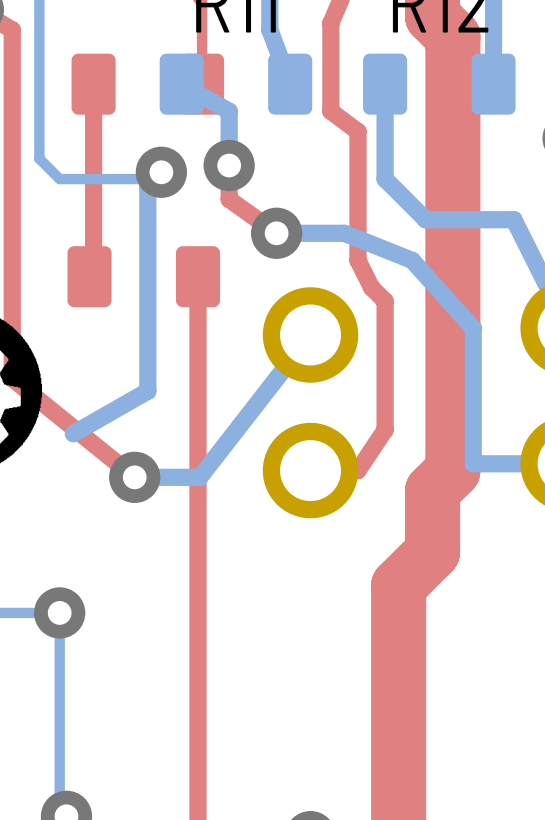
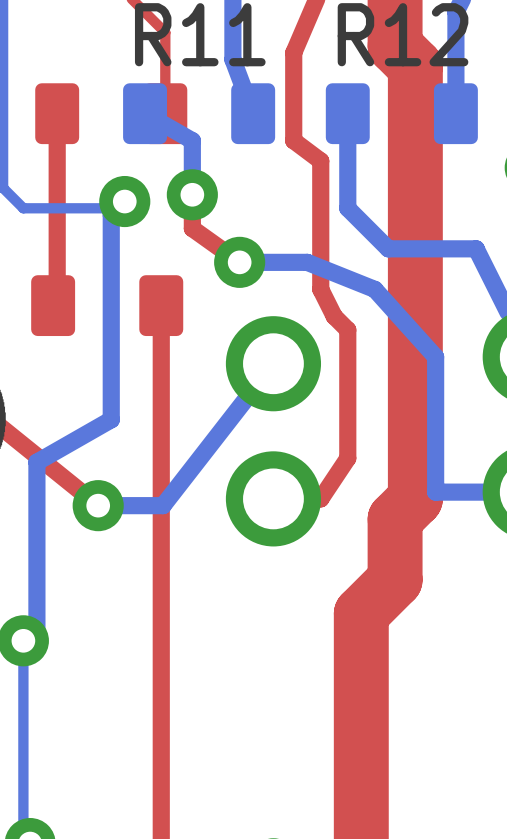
bottom track: none -> (36, 462) (36, 639)

